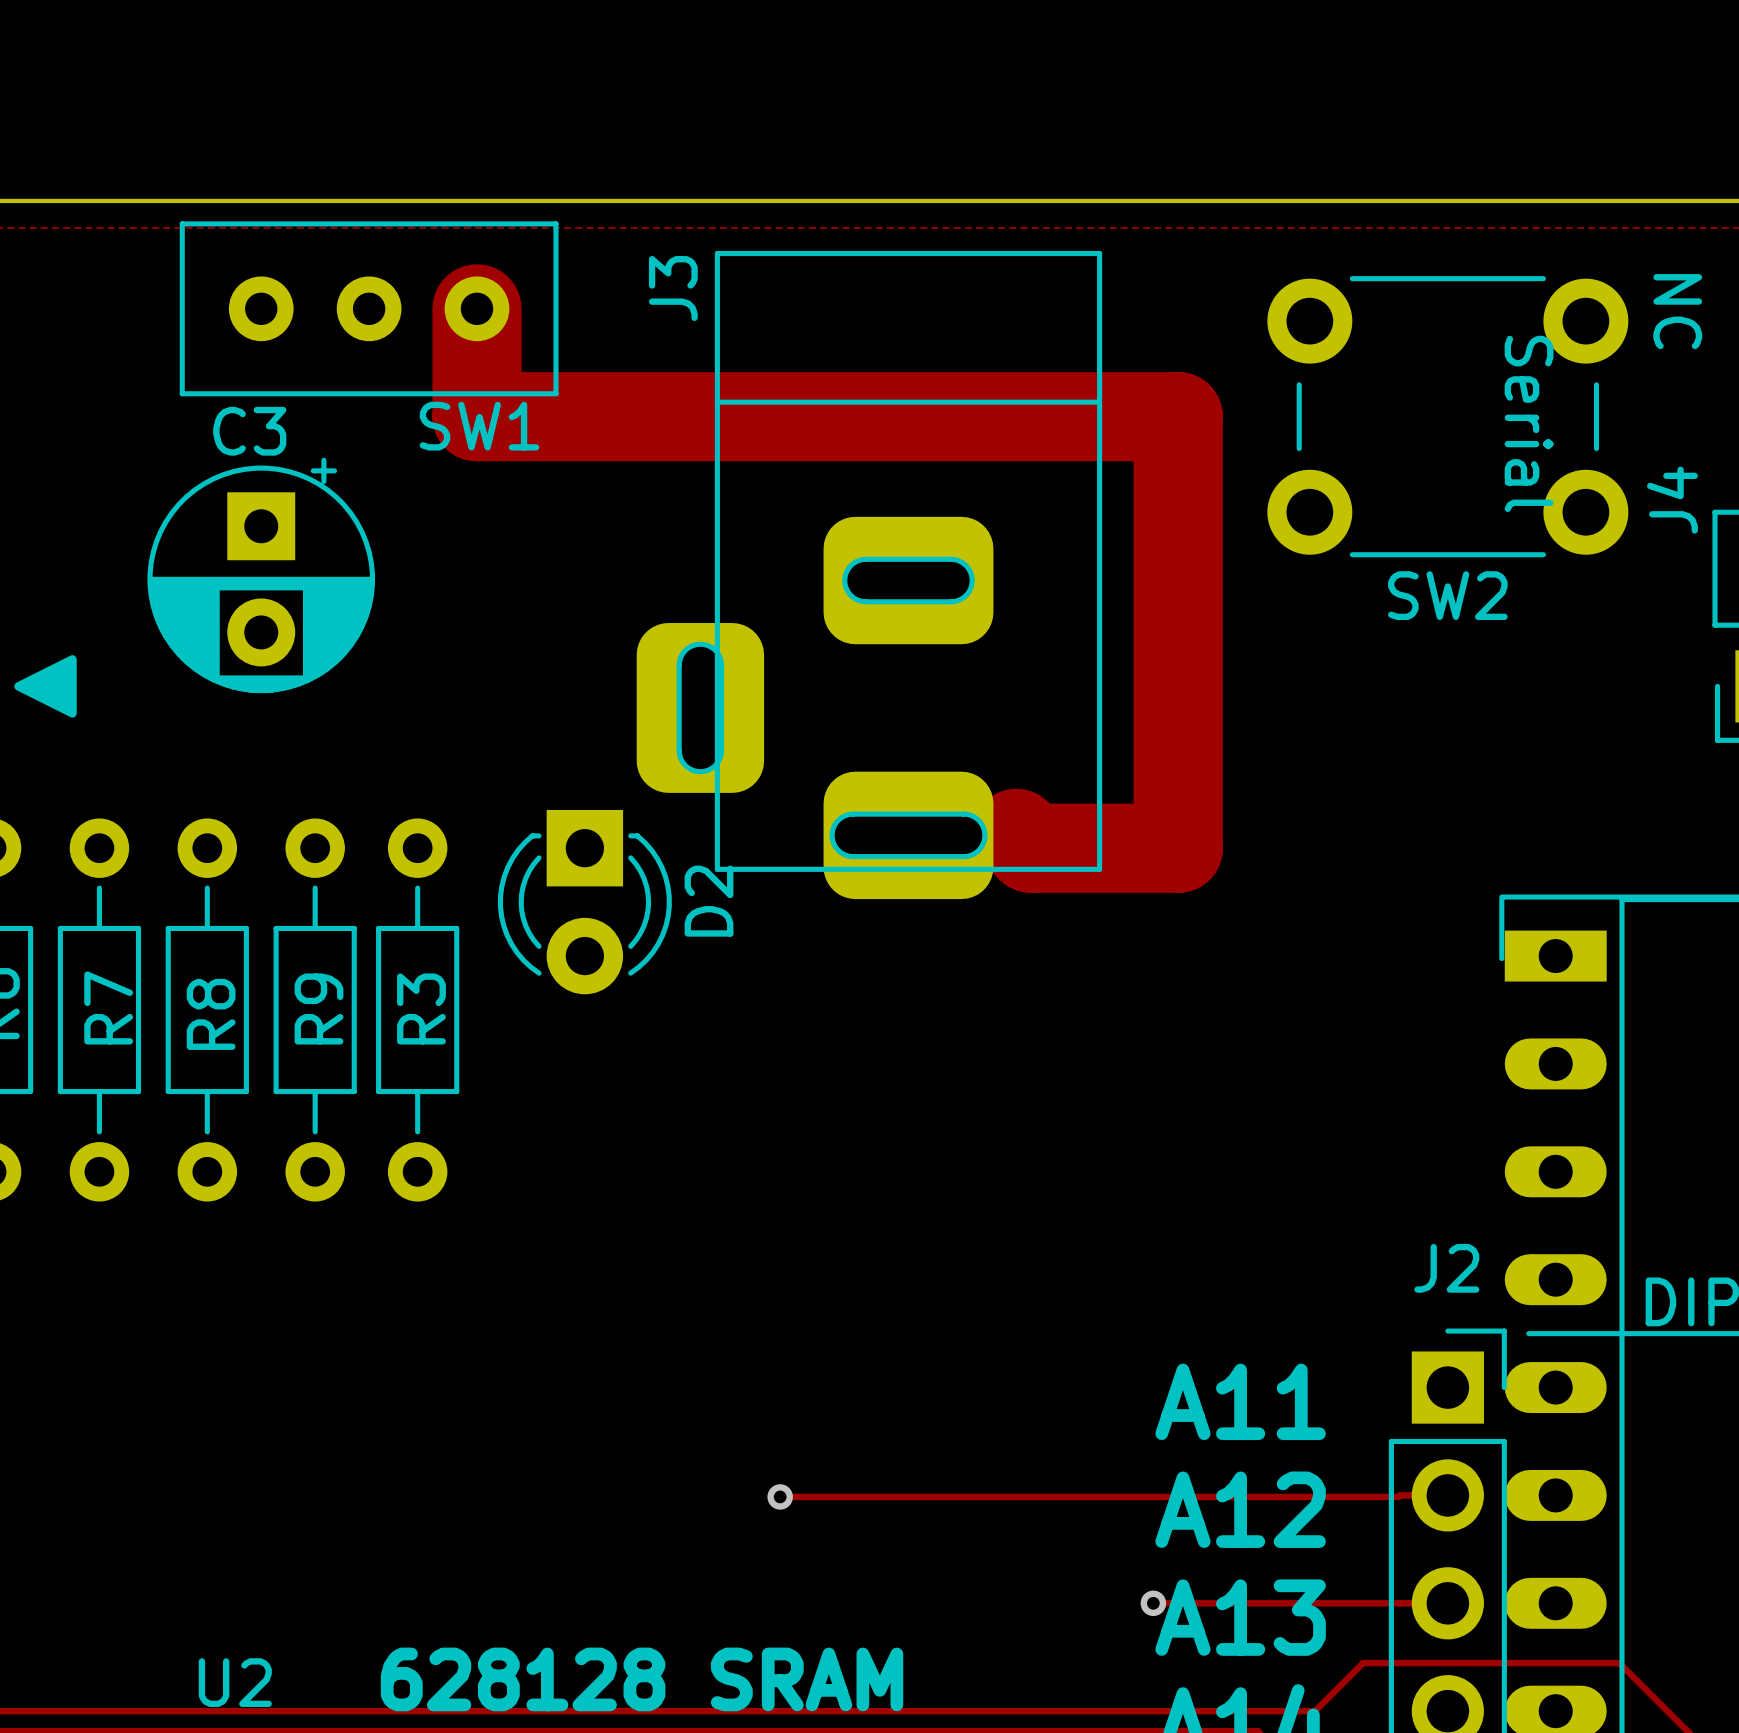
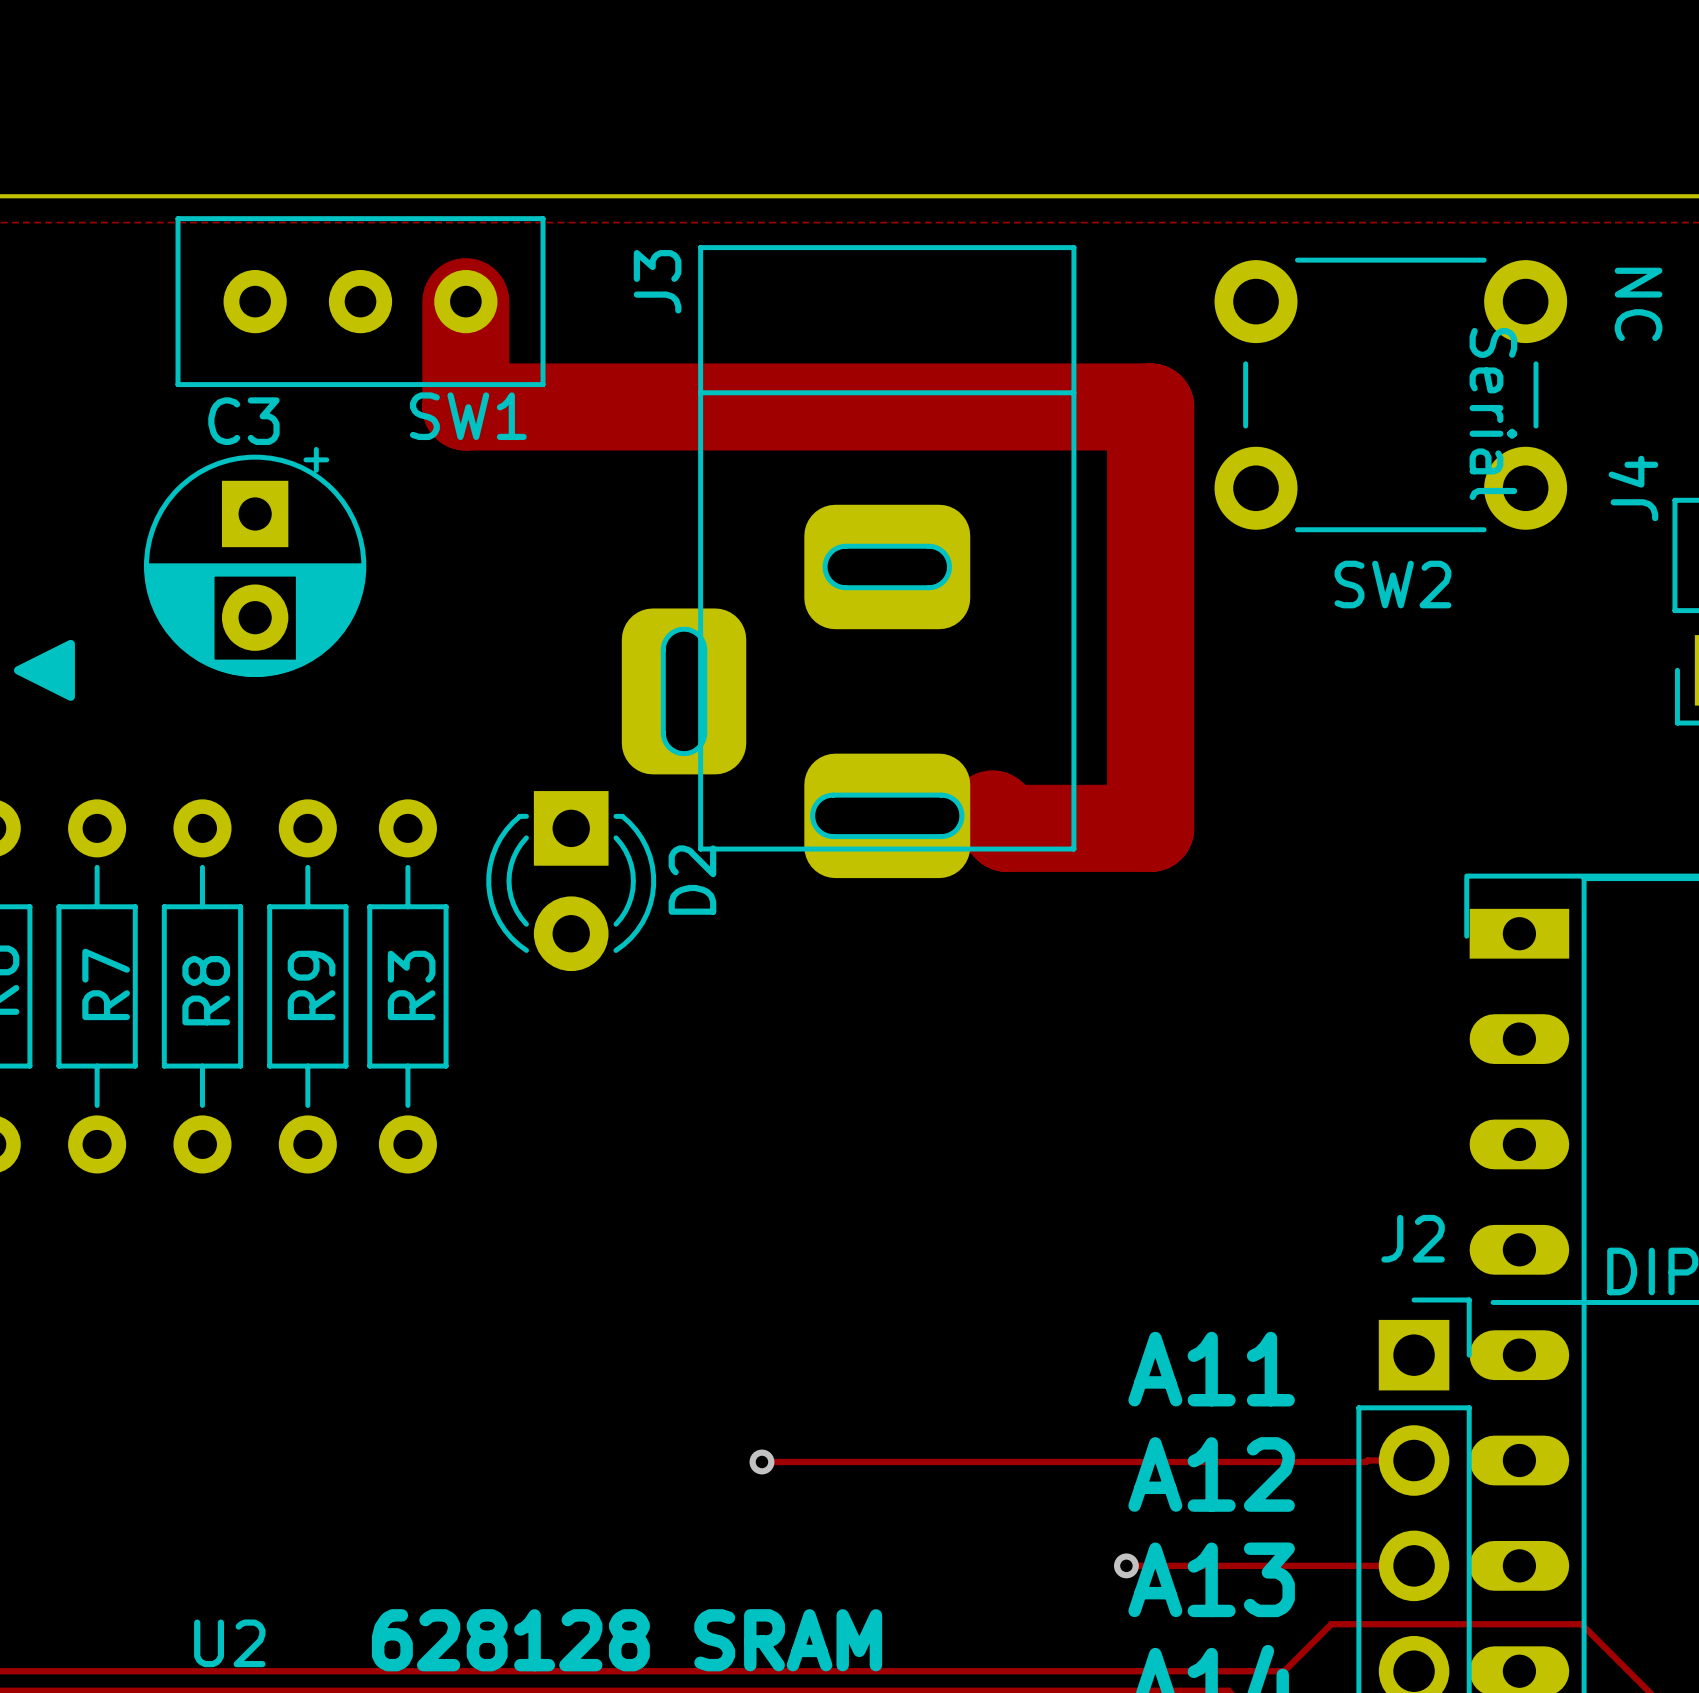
SW2 position: (1447, 416) -> (1390, 394)
SW2 name position: SW2 (1447, 595) -> SW2 (1392, 584)

